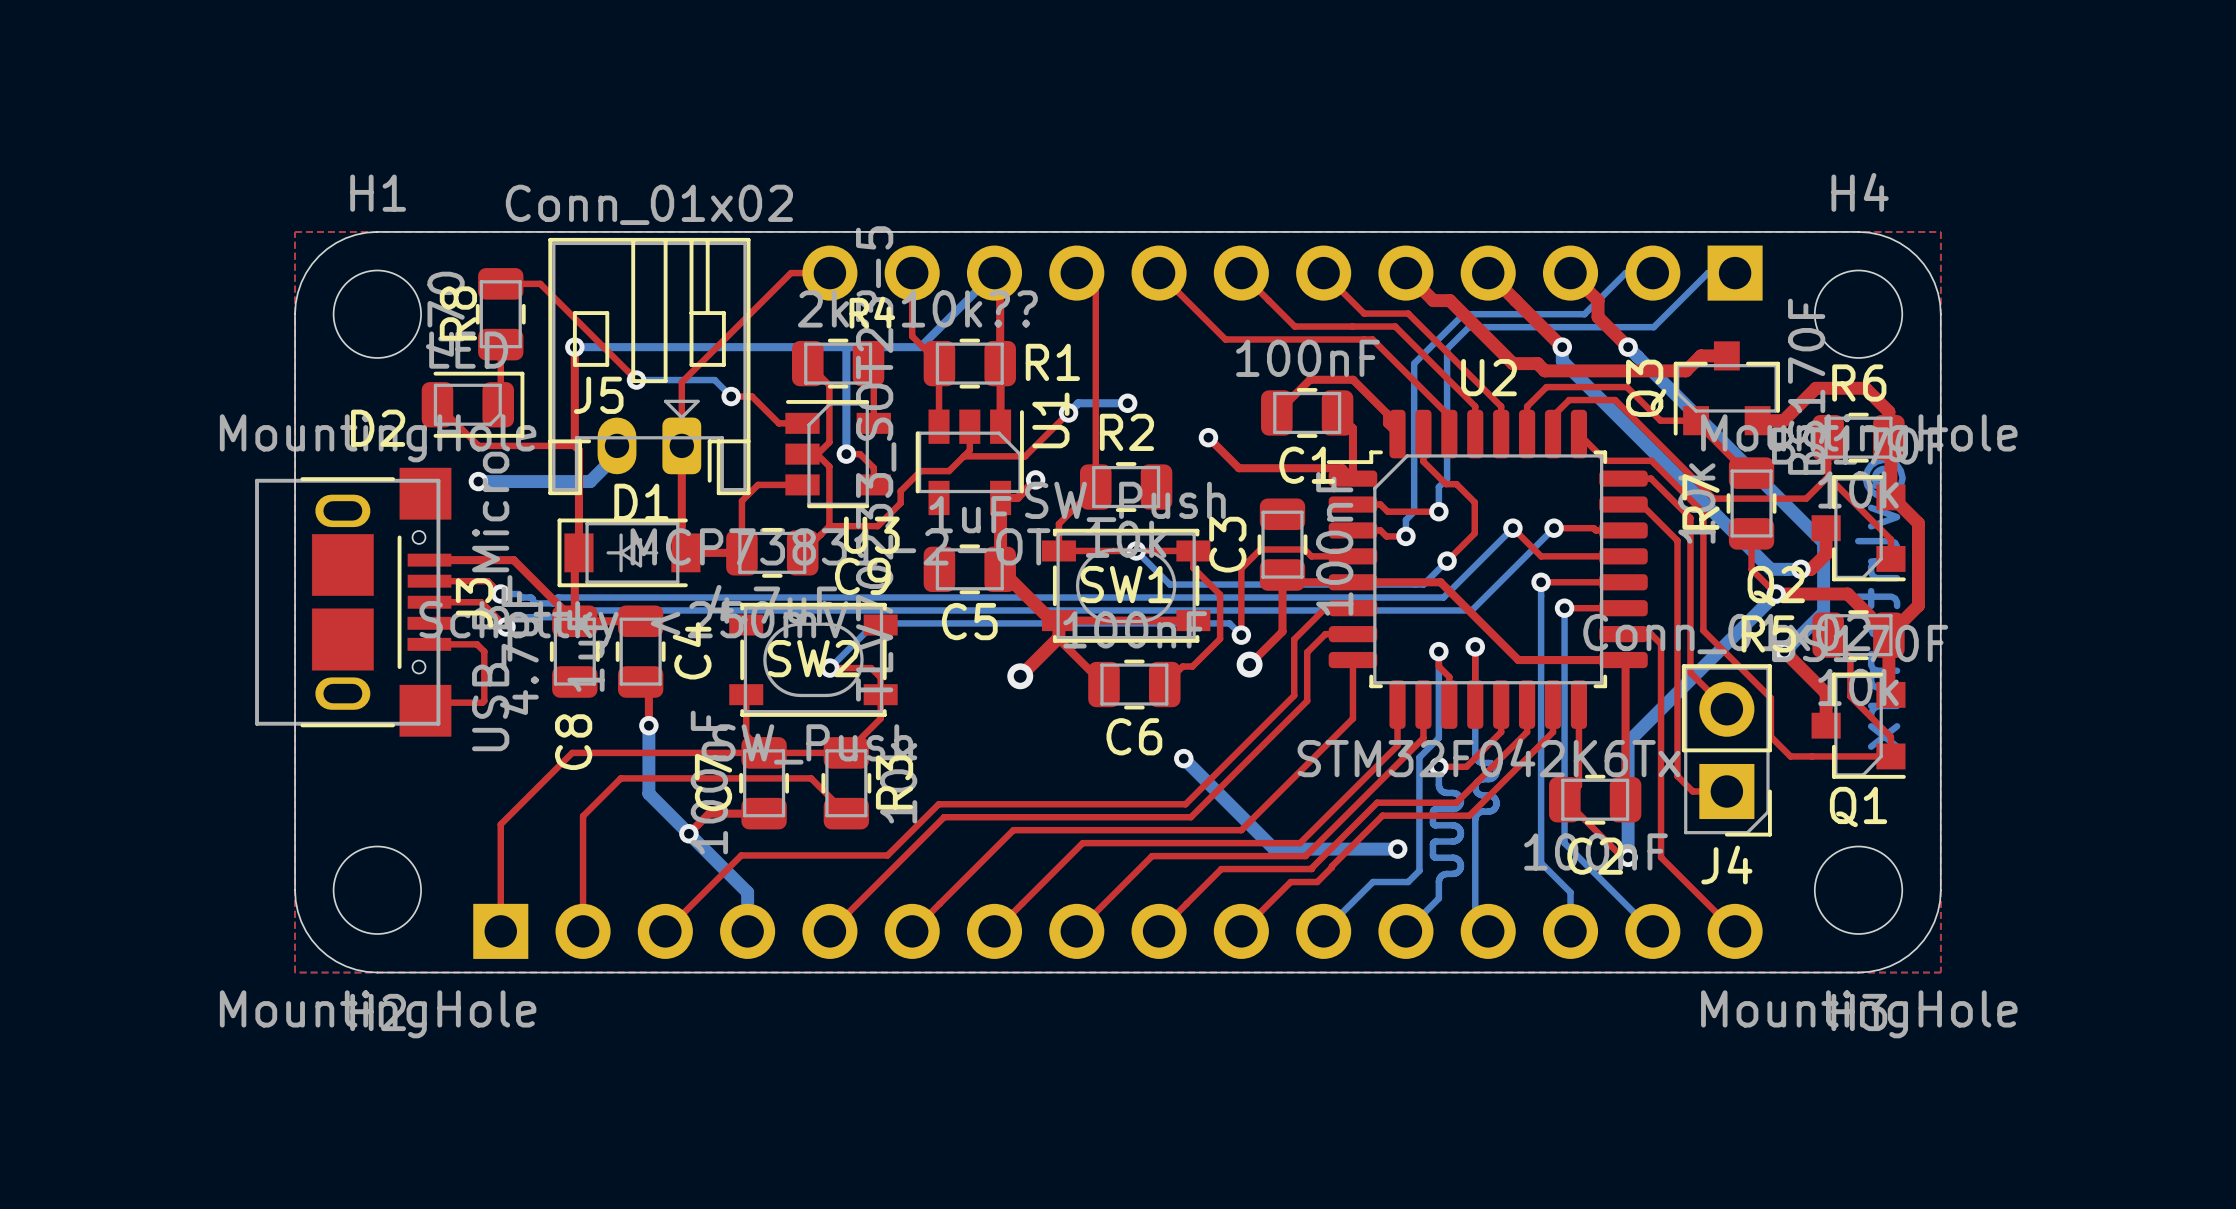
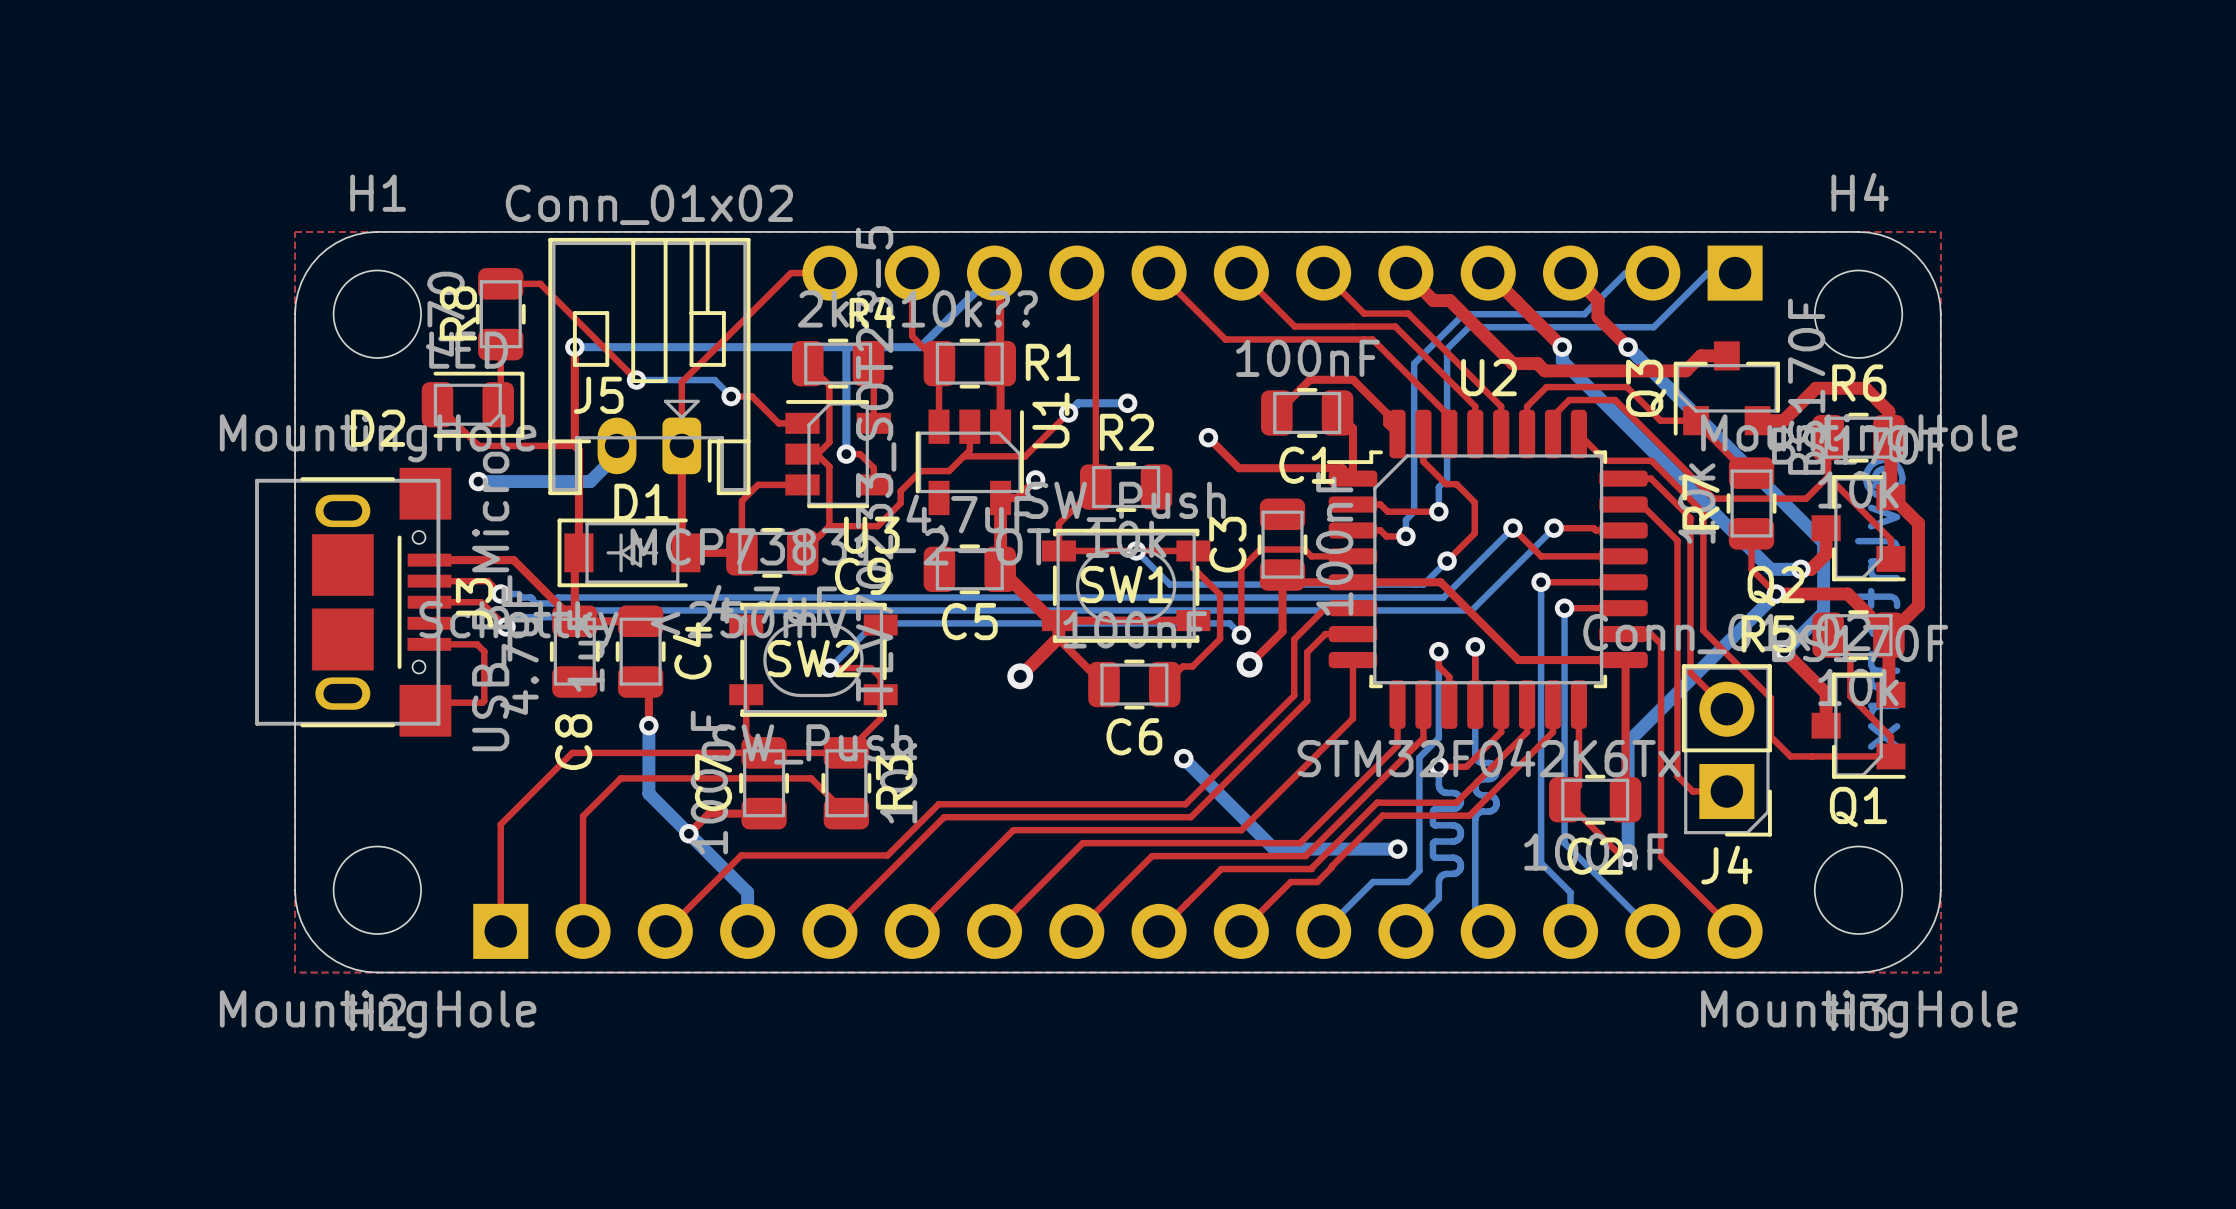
C5 value: 1uF (970, 514) -> 4.7uF (970, 513)

